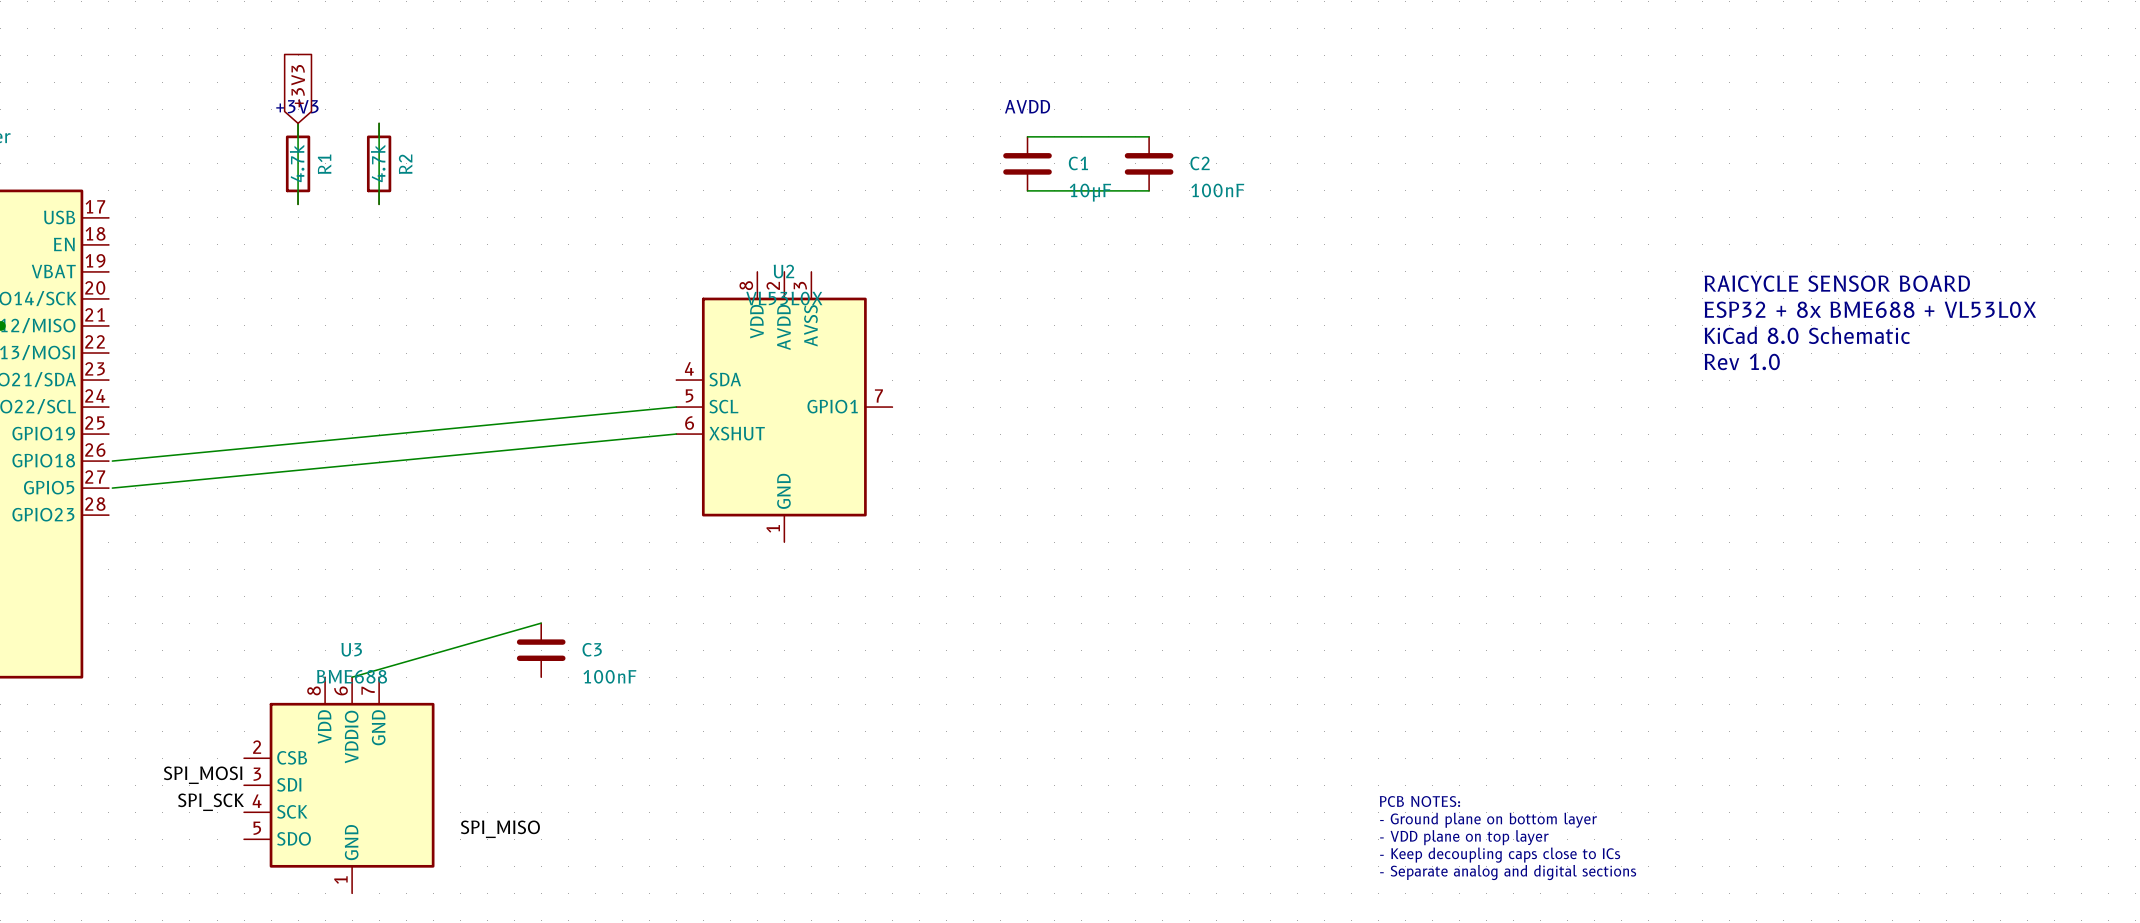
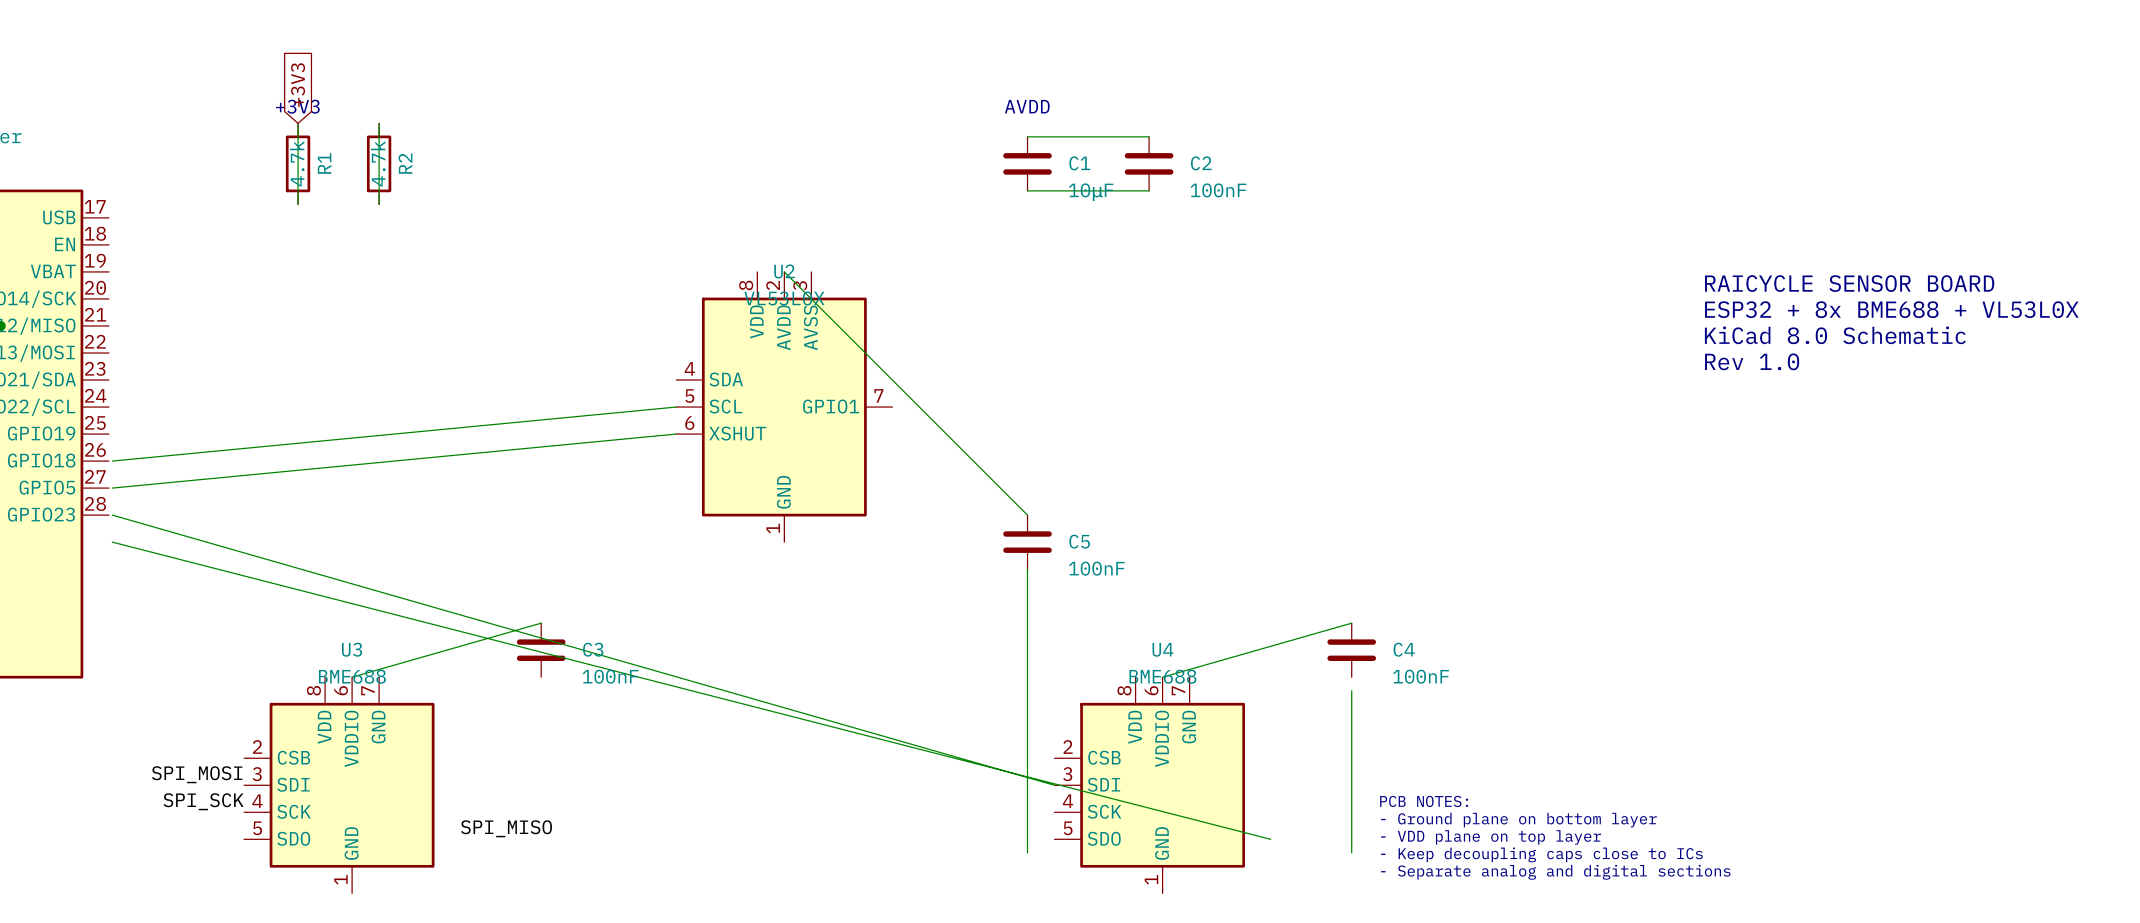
wire: none -> (784, 271) (1027, 515)
wire: none -> (112, 515) (1054, 785)
wire: none -> (112, 542) (1270, 839)
C5: none -> 100nF (1027, 542)
wire: none -> (1027, 569) (1027, 852)
wire: none -> (1351, 623) (1162, 677)
C4: none -> 100nF (1351, 650)
wire: none -> (1351, 690) (1351, 852)
U4: none -> BME688 (1149, 785)

